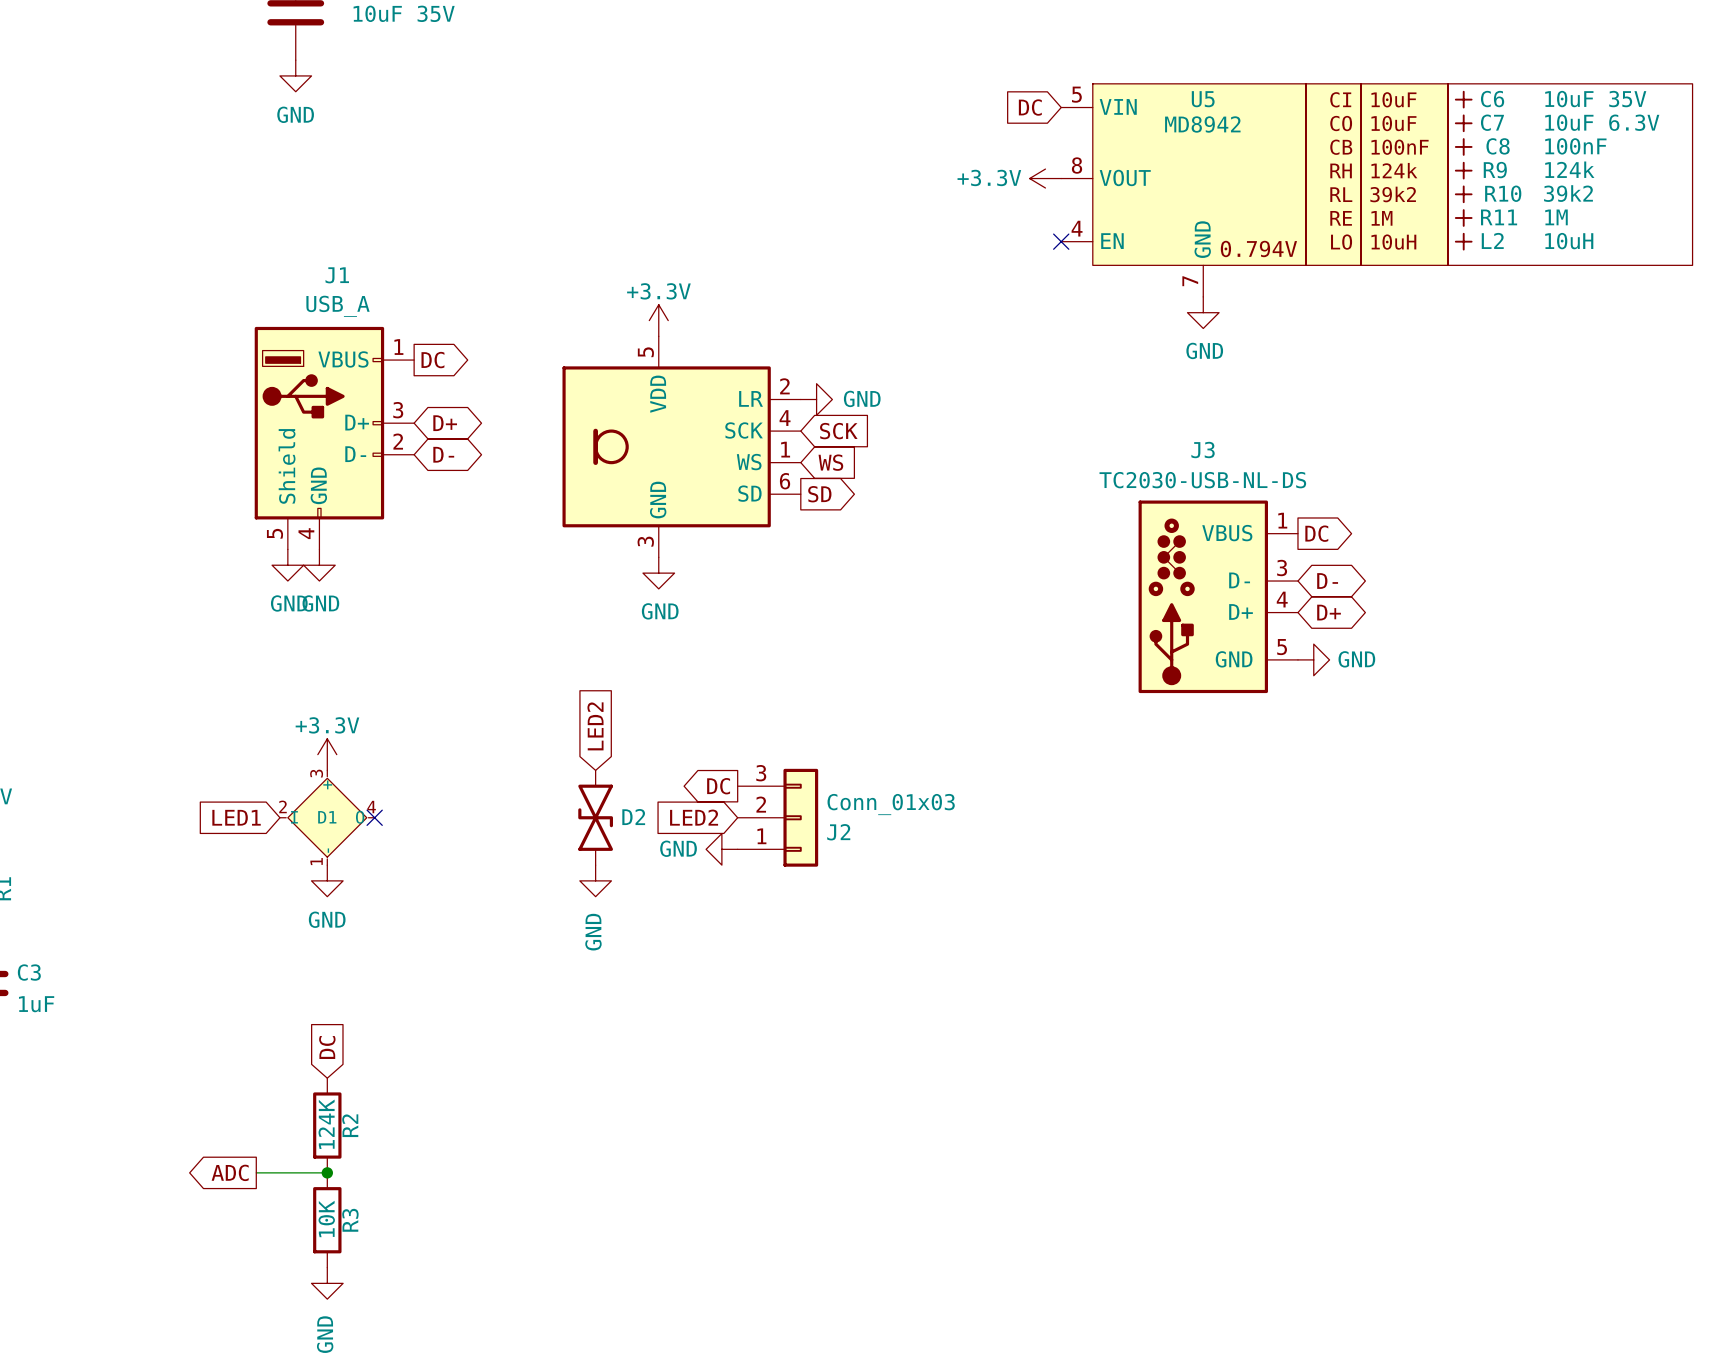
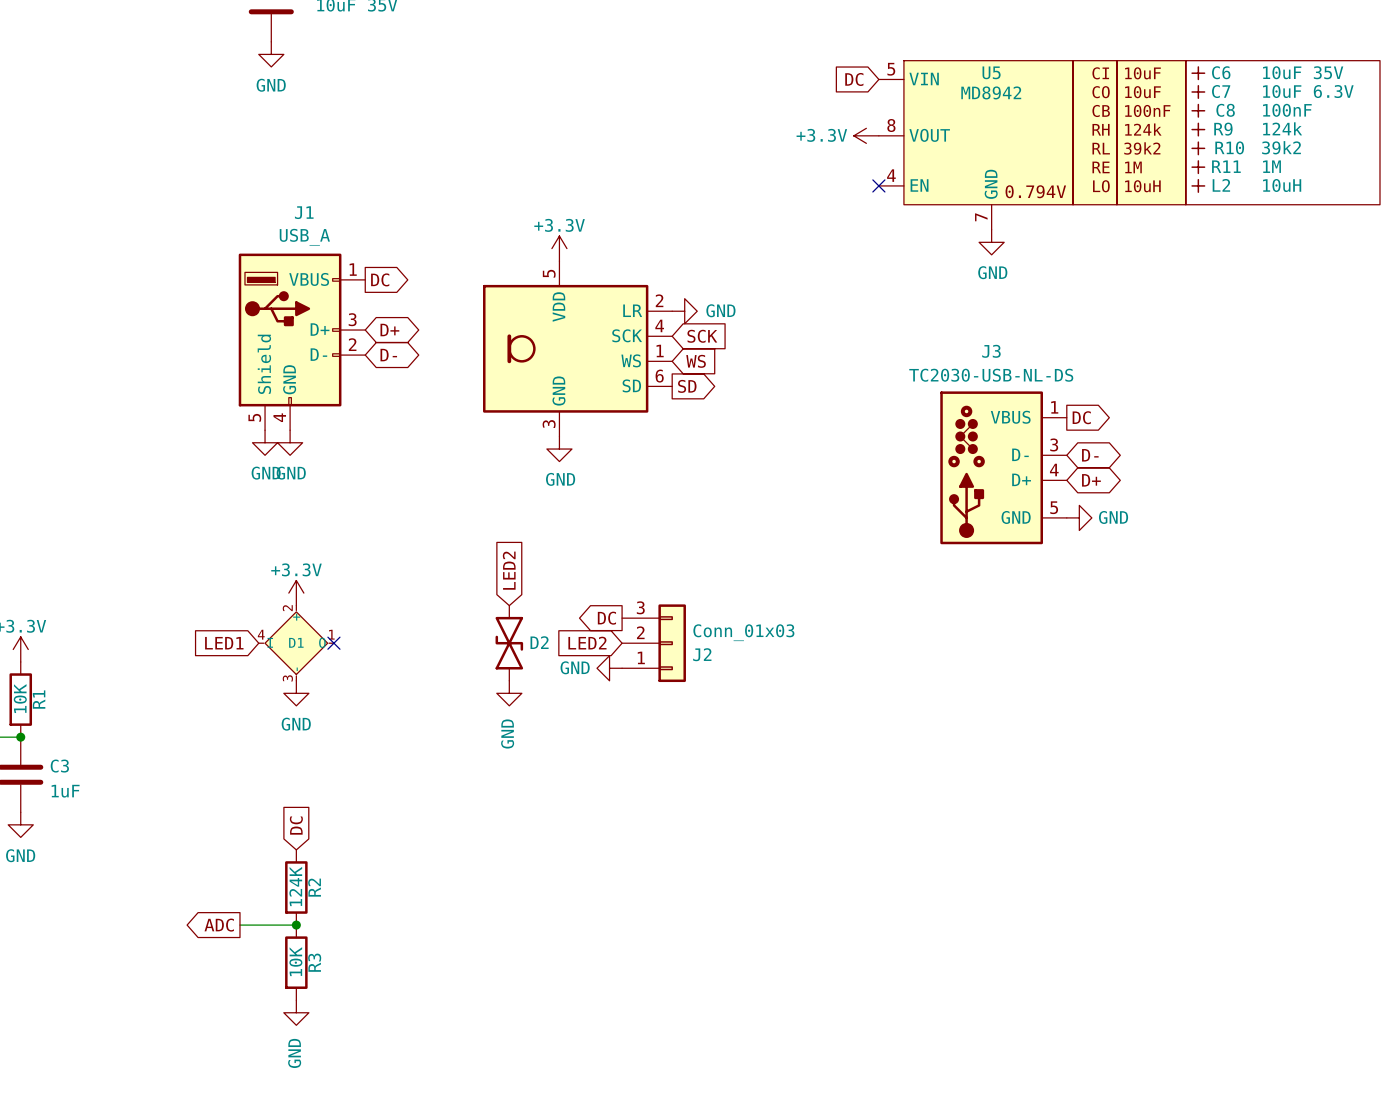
D1 pin number: 3 (316, 773) -> 2 (287, 608)
D1 pin number: 2 (282, 806) -> 4 (261, 634)
D1 pin number: 4 (371, 807) -> 1 (331, 634)
D1 pin number: 1 (316, 861) -> 3 (287, 678)

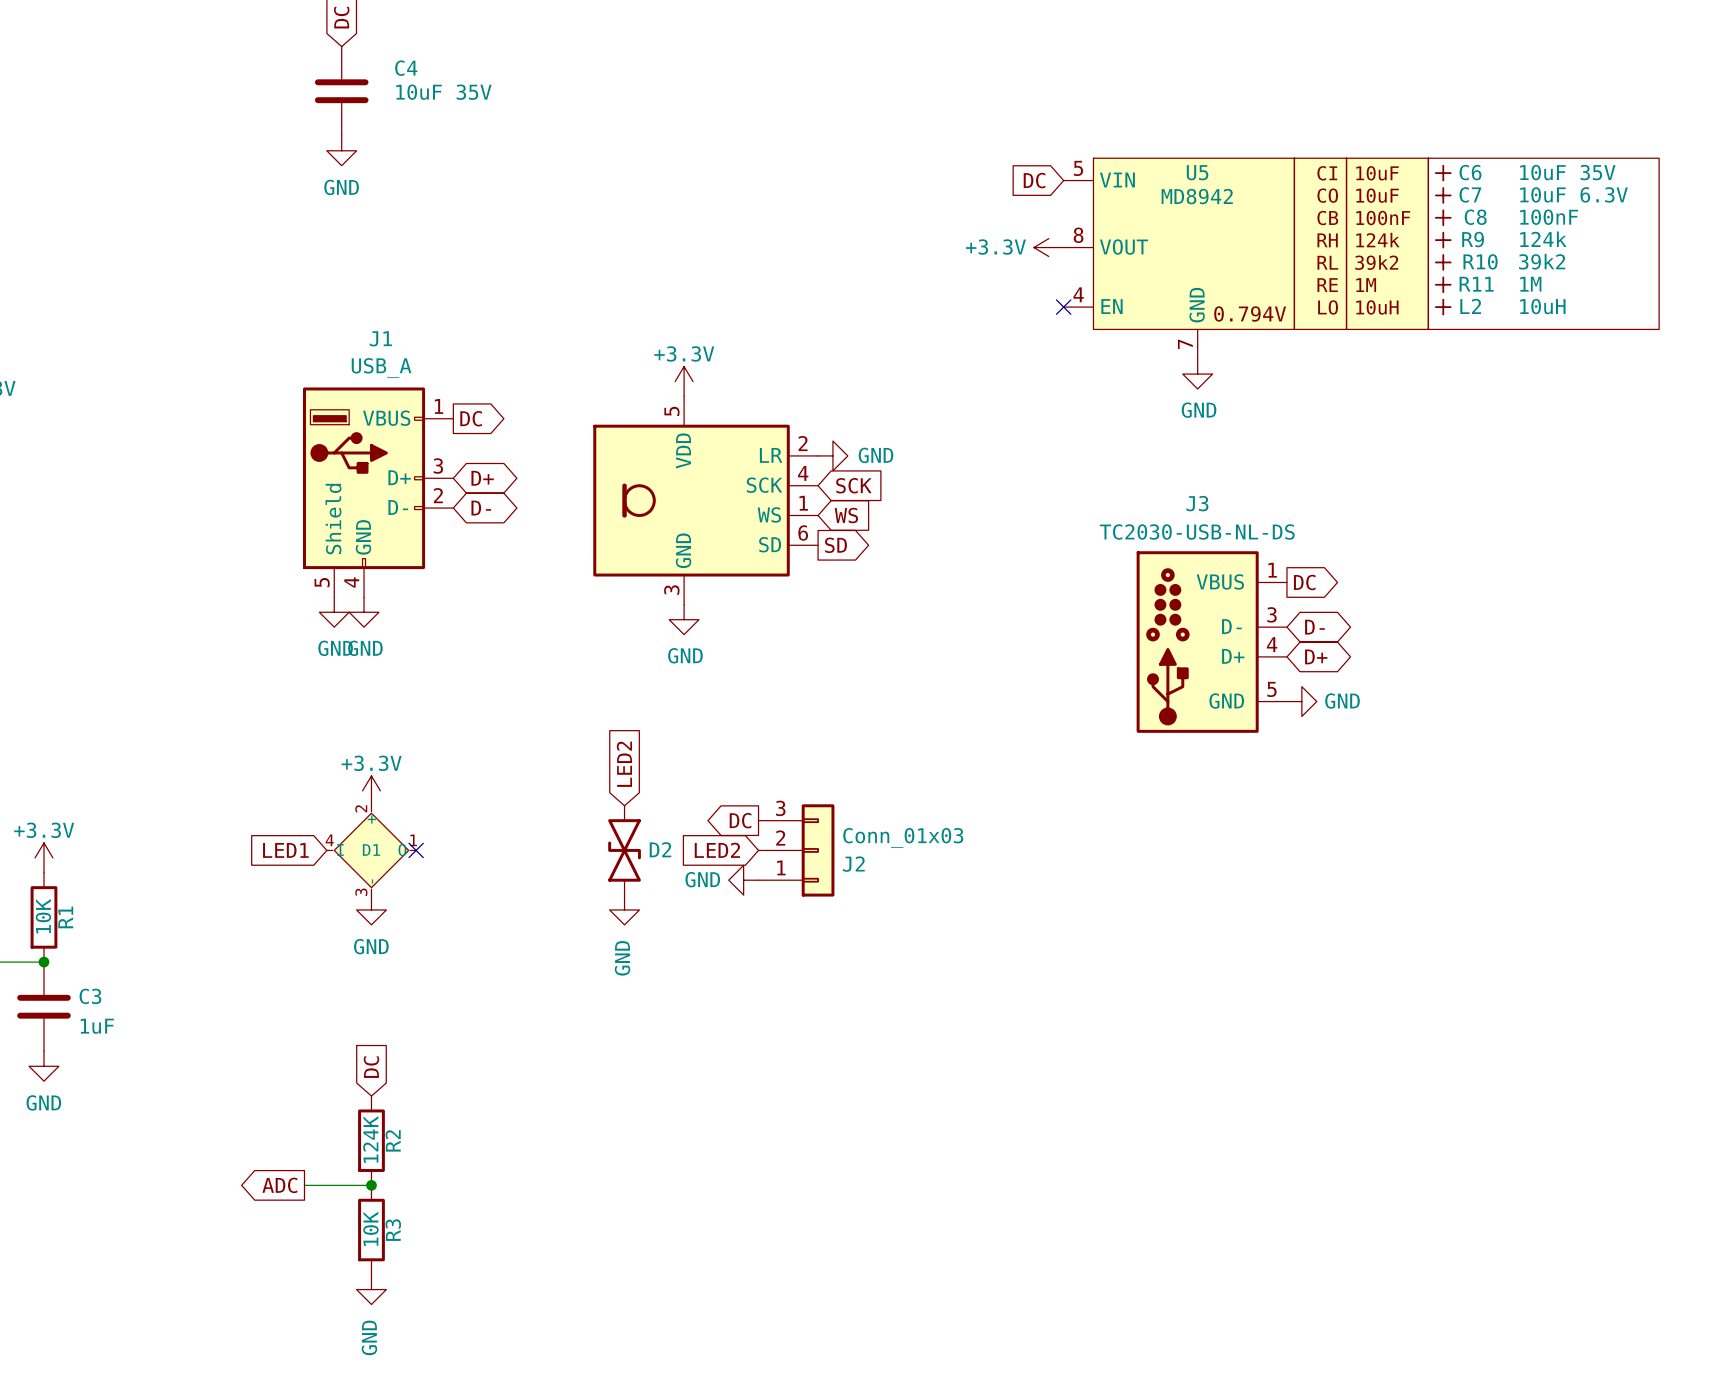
J3 symbol: [940, 391, 1067, 545] -> [1136, 551, 1287, 733]

